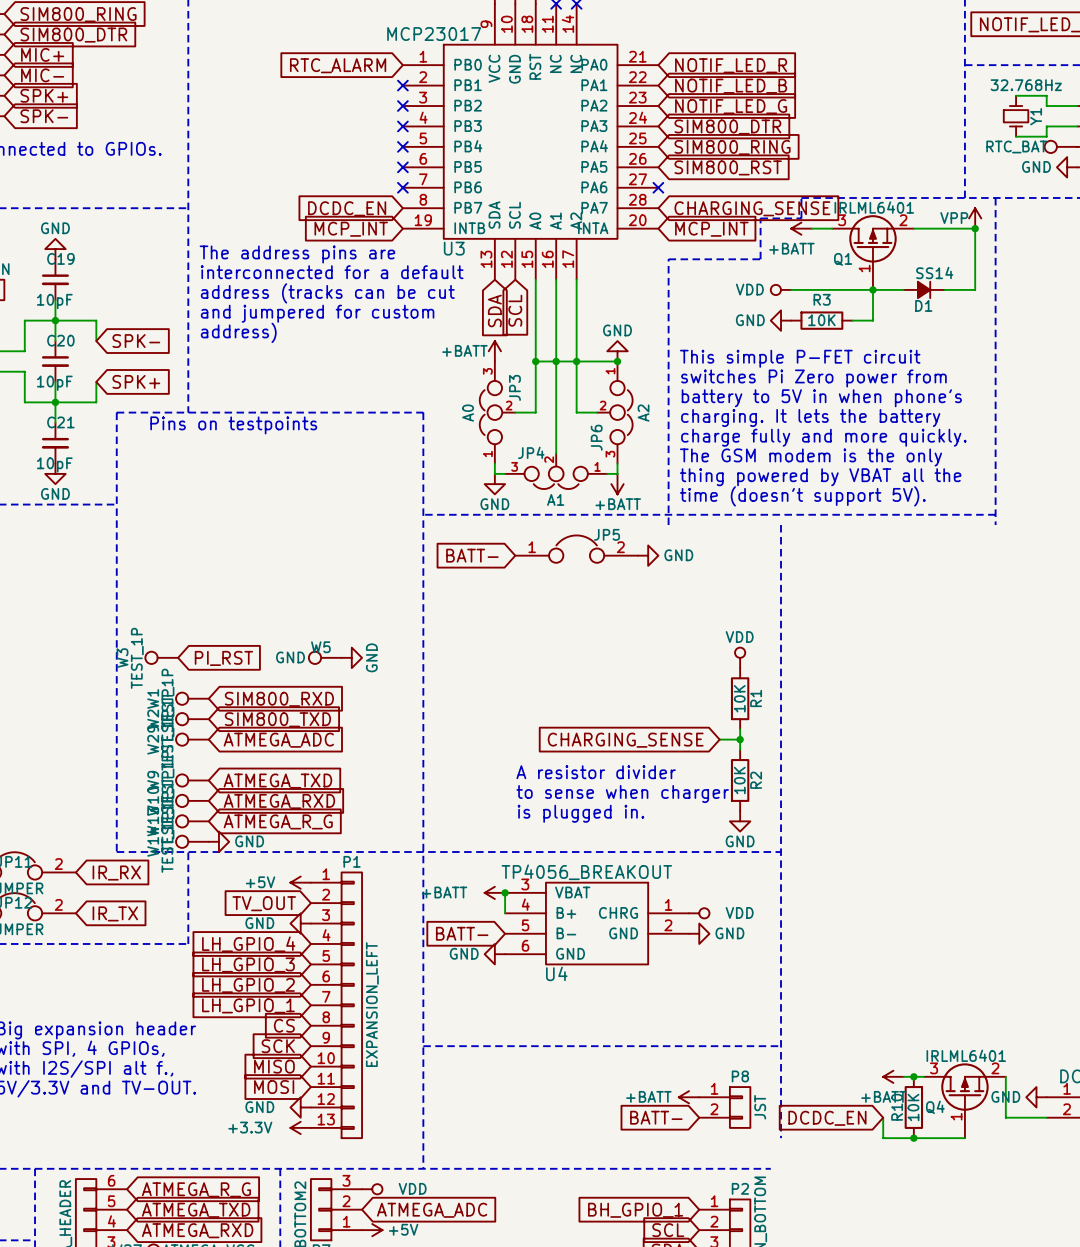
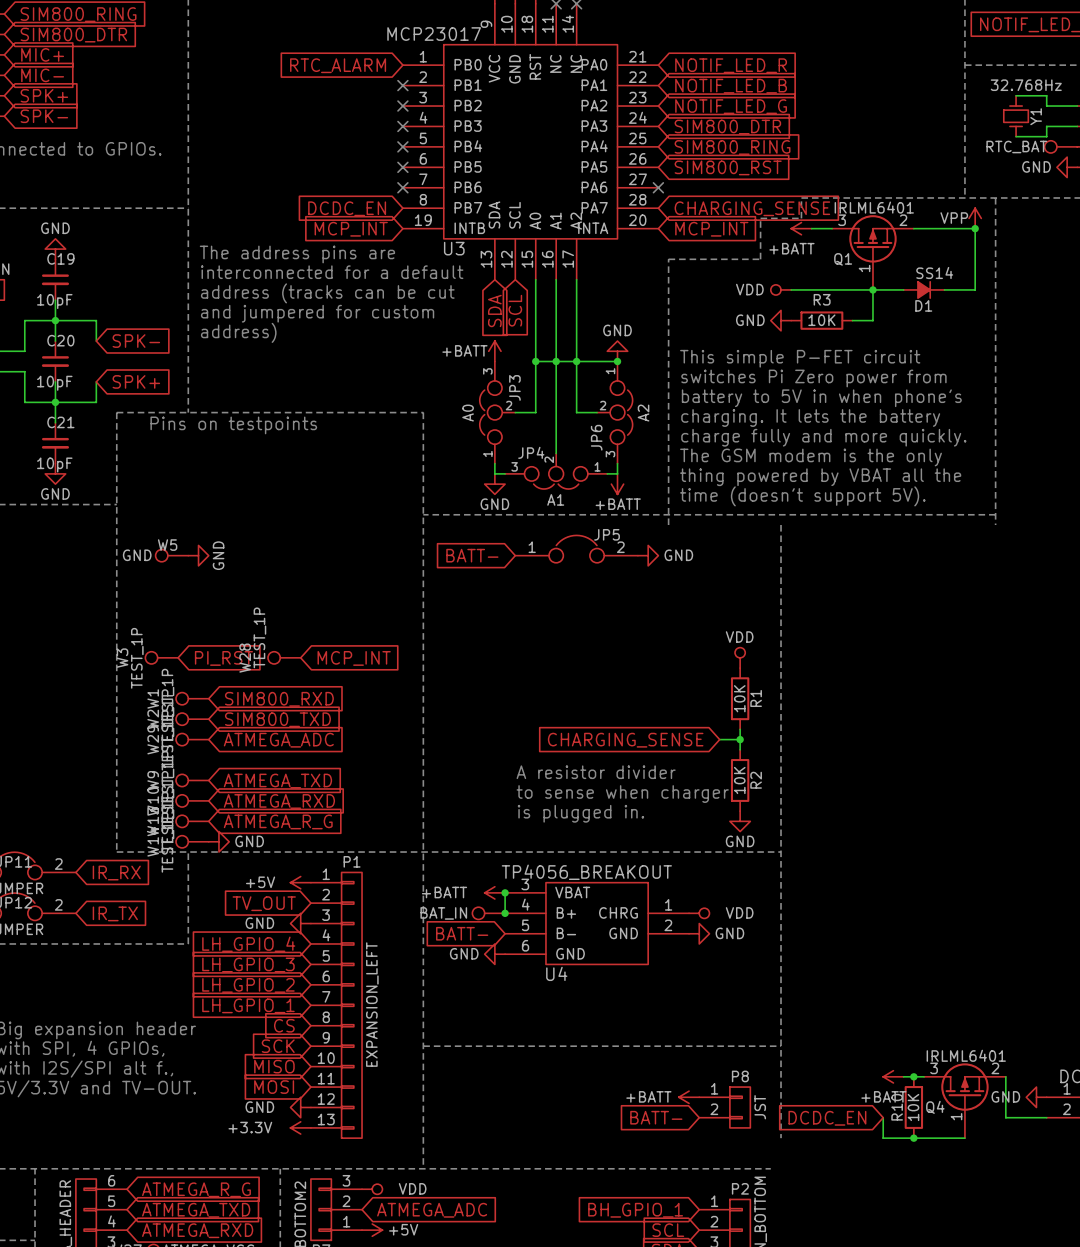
W28: none -> TEST_1P (284, 657)
W5 position: (325, 657) -> (171, 555)
power symbol position: GND (351, 657) -> GND (198, 555)
global label: none -> MCP_INT (354, 658)
part: none -> BAT_IN (488, 913)
junction: none -> (505, 913)

